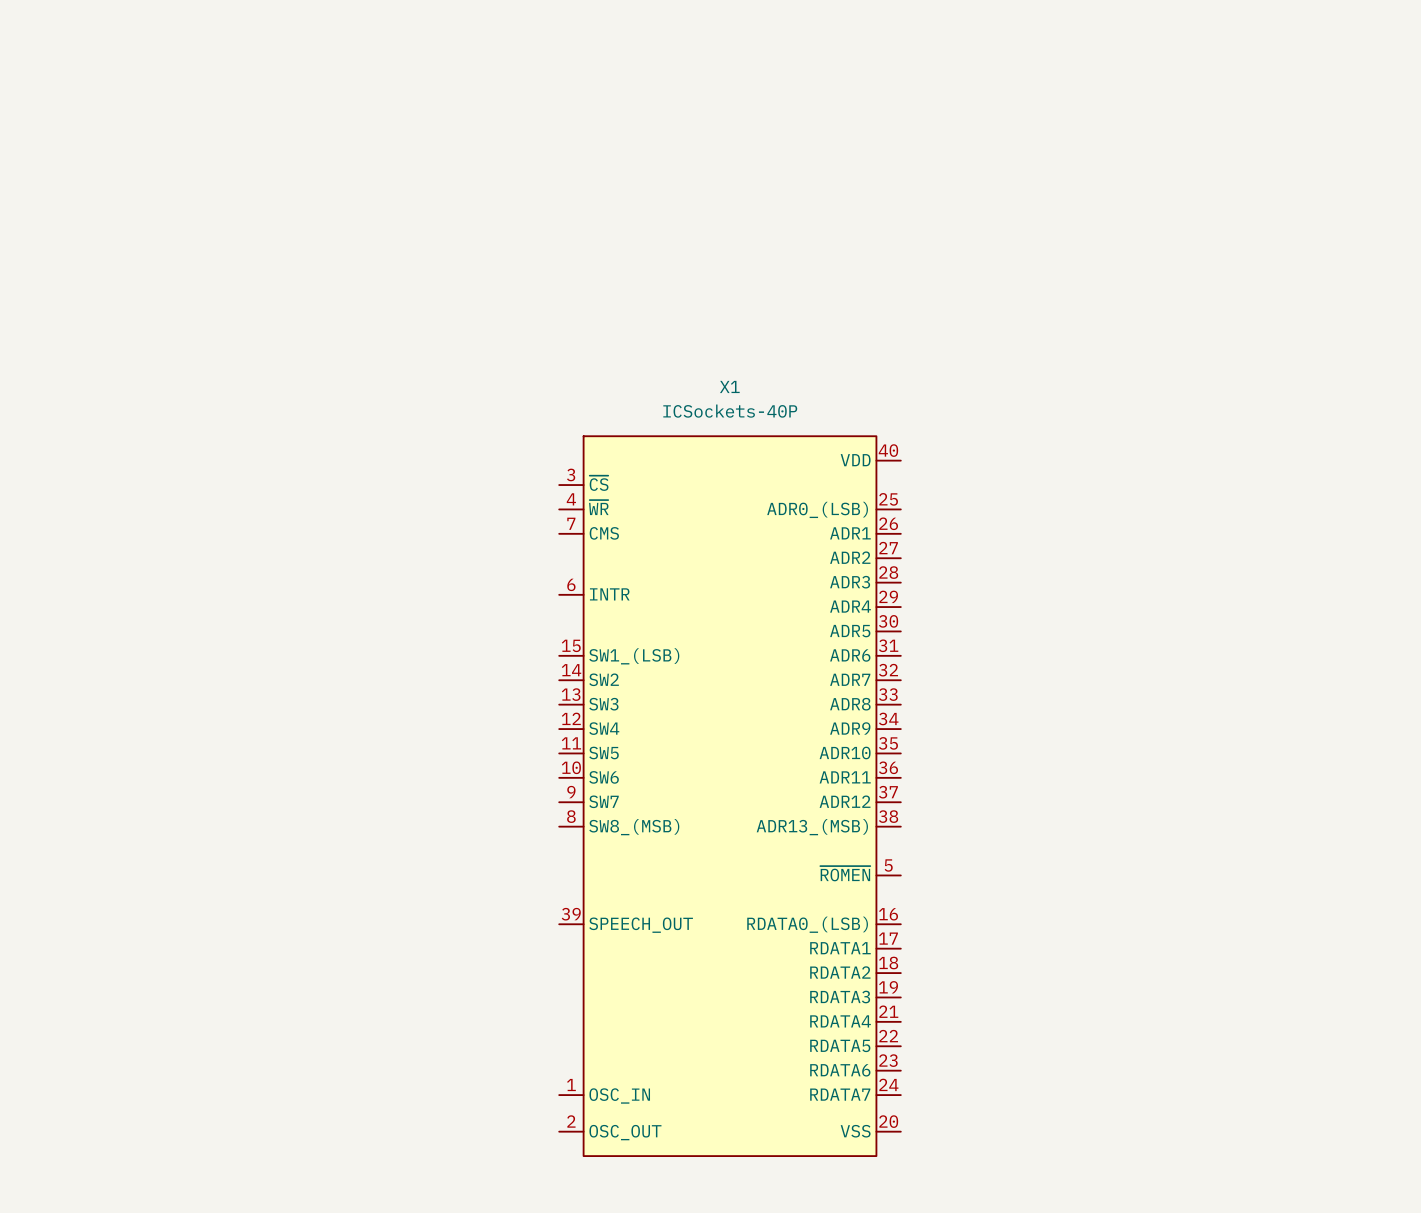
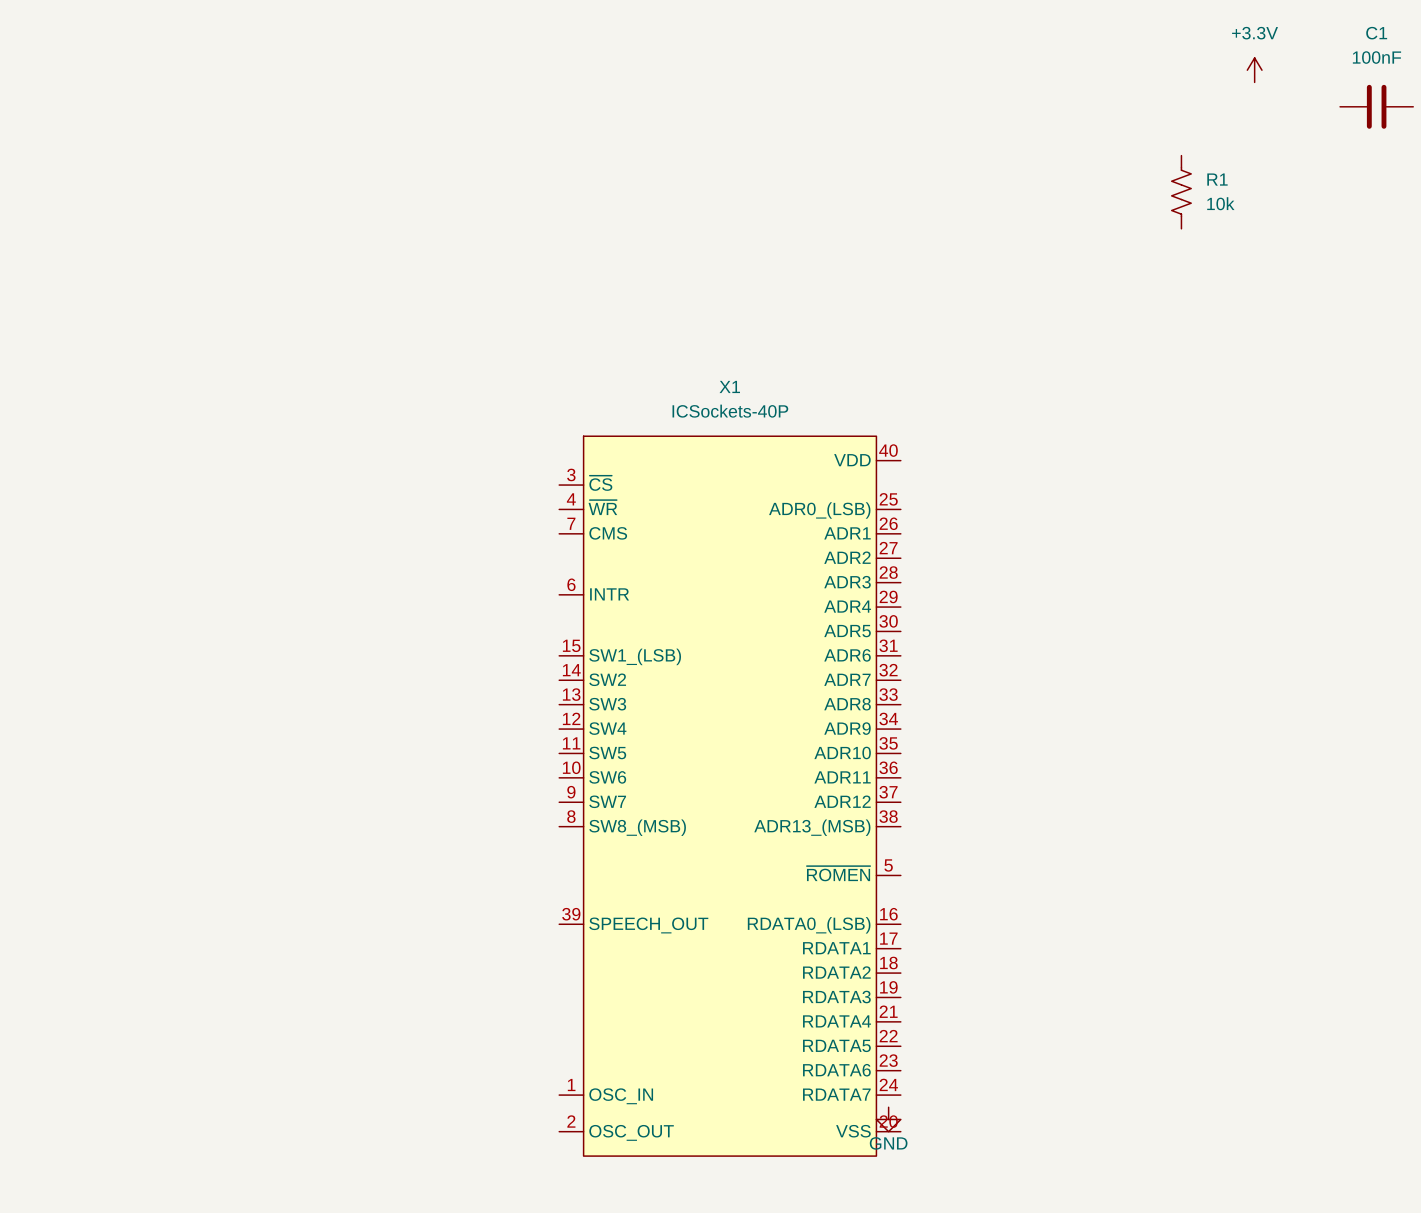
power symbol: none -> +3.3V (1254, 70)
C1: none -> 100nF (1376, 106)
R1: none -> 10k (1181, 192)
power symbol: none -> GND (888, 1119)

